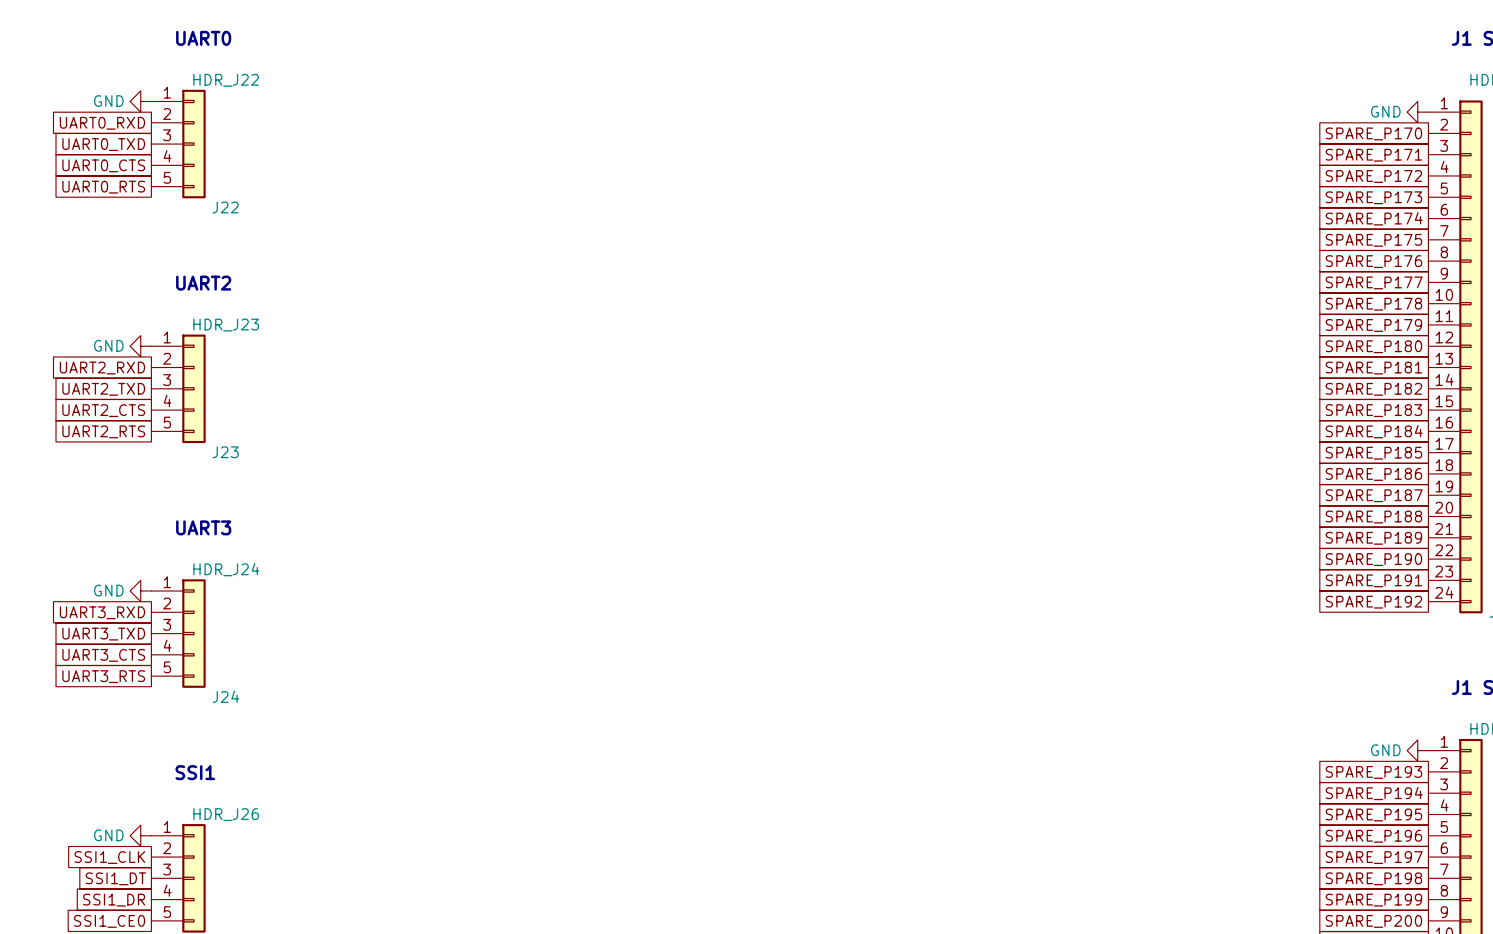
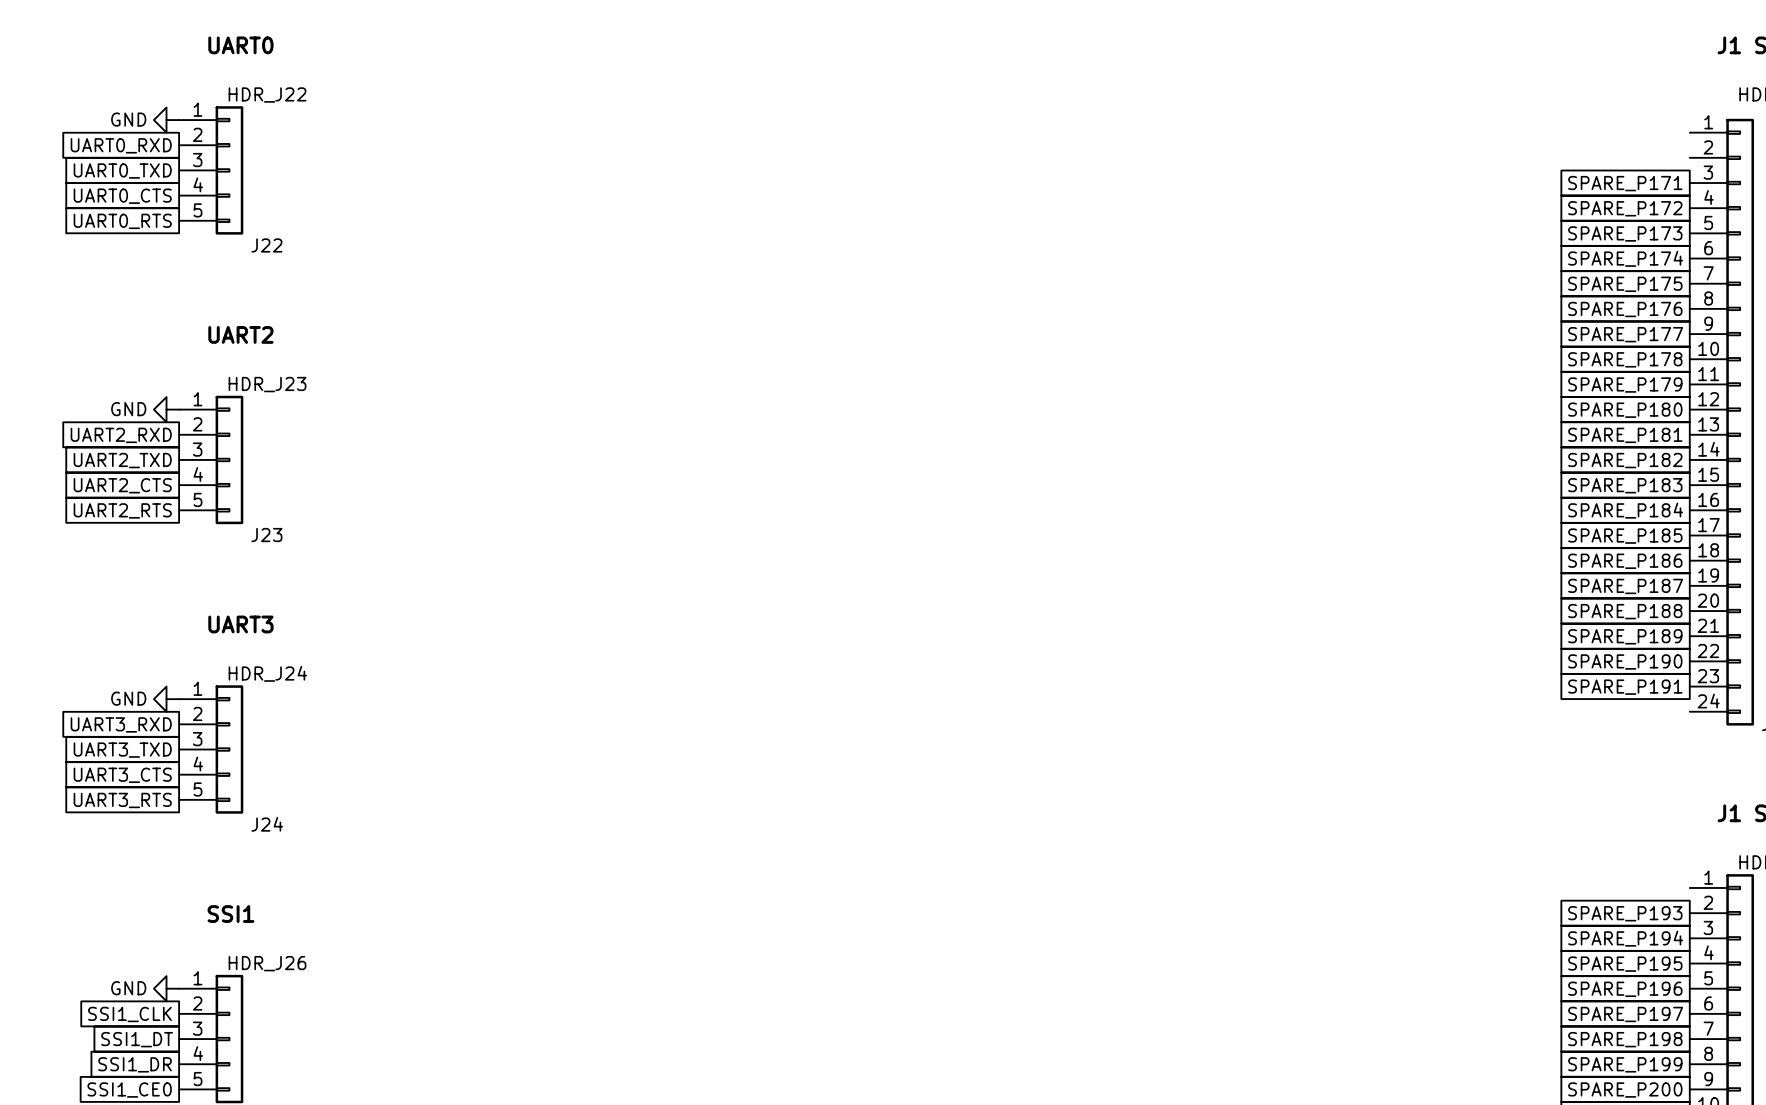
power symbol: GND (1417, 112) -> none
global label: SPARE_P170 (1373, 133) -> none
global label: SPARE_P192 (1373, 602) -> none
power symbol: GND (1417, 750) -> none

